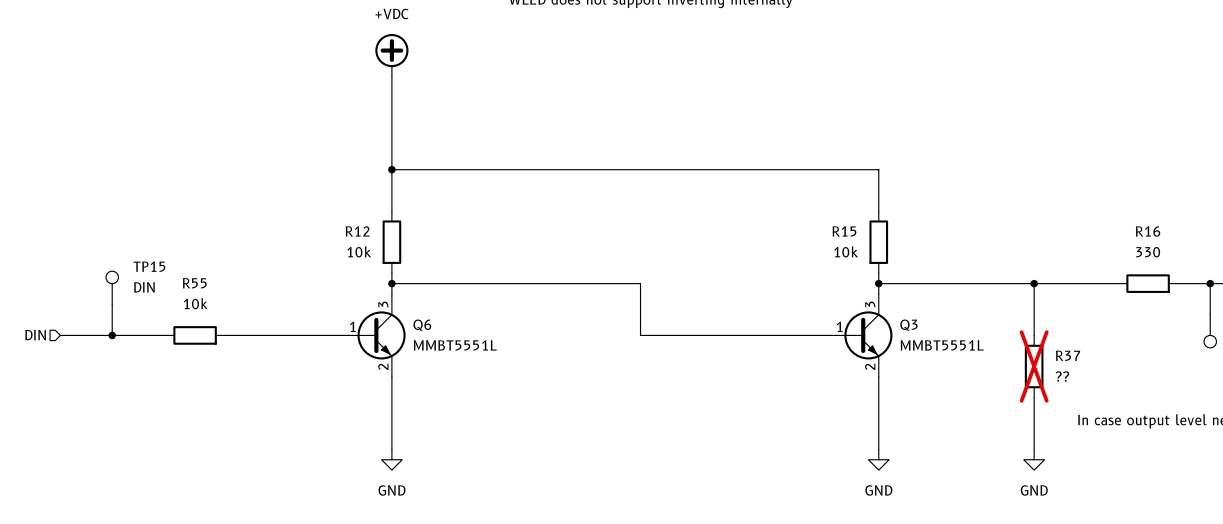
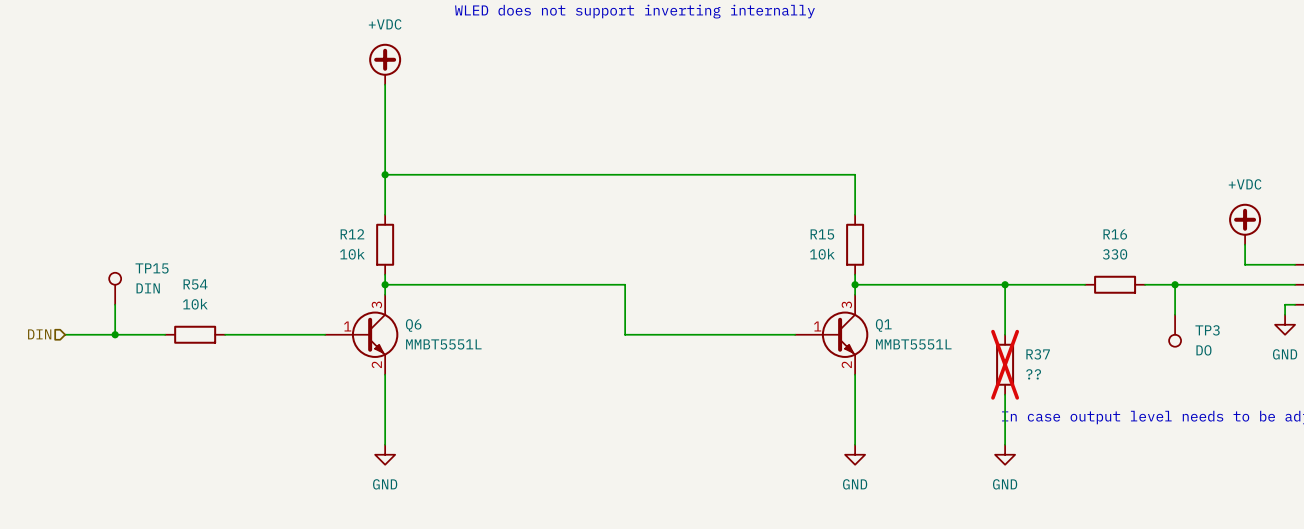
R55 name: R55 (194, 283) -> R54 (195, 284)
Q3 name: Q3 (908, 325) -> Q1 (883, 325)

